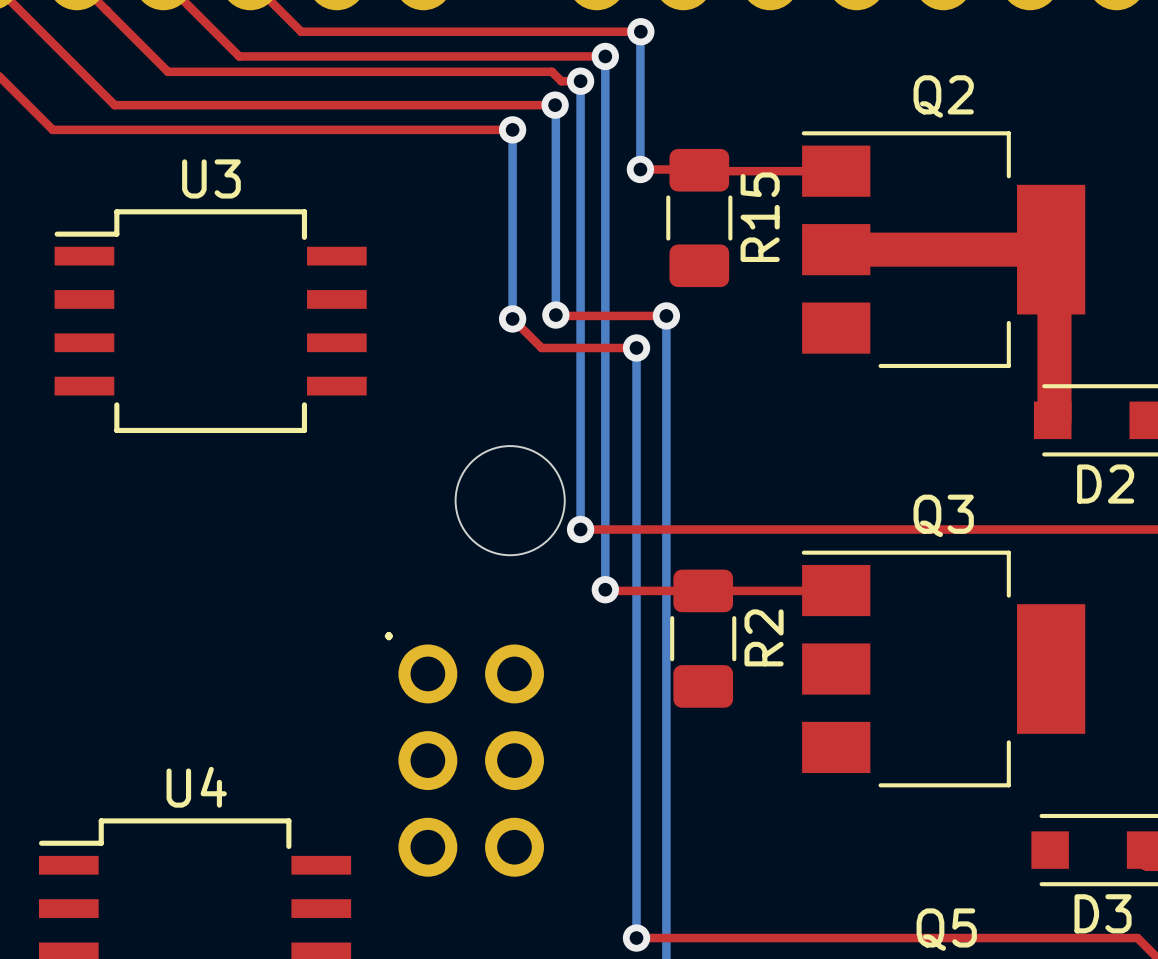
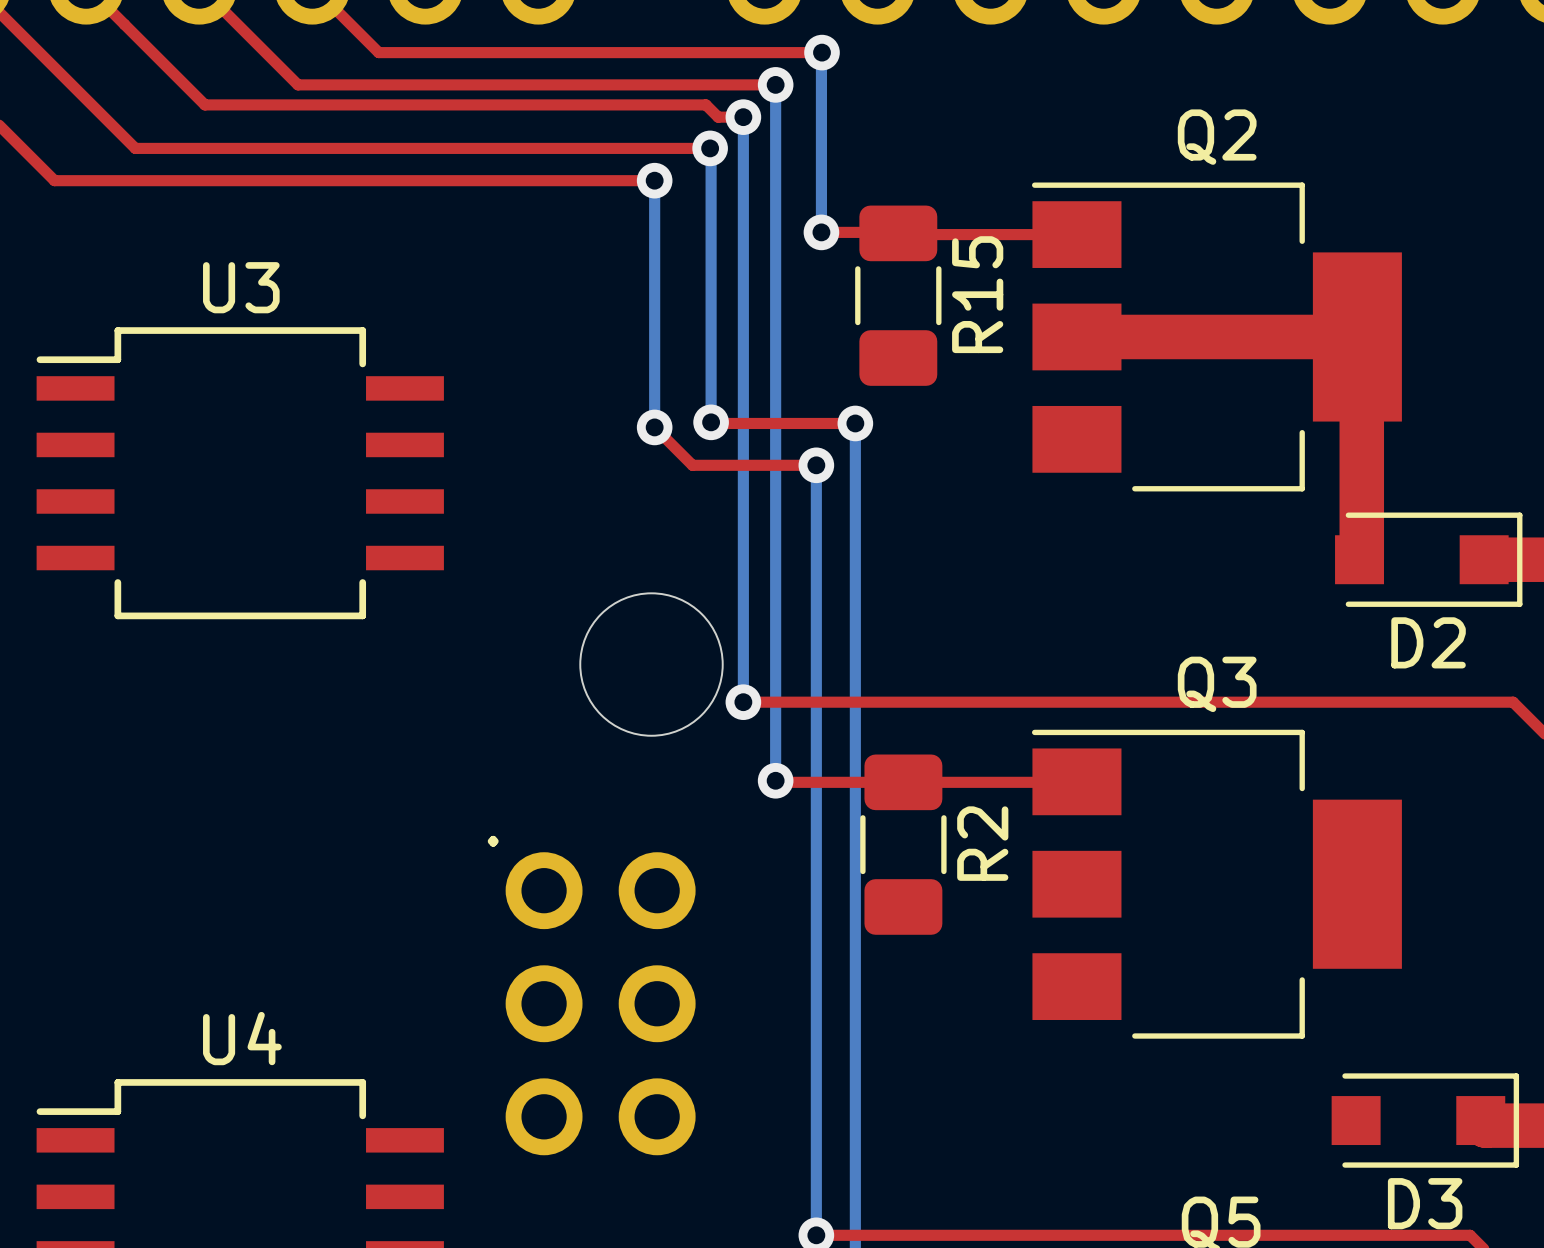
U3 position: (210, 321) -> (240, 473)

